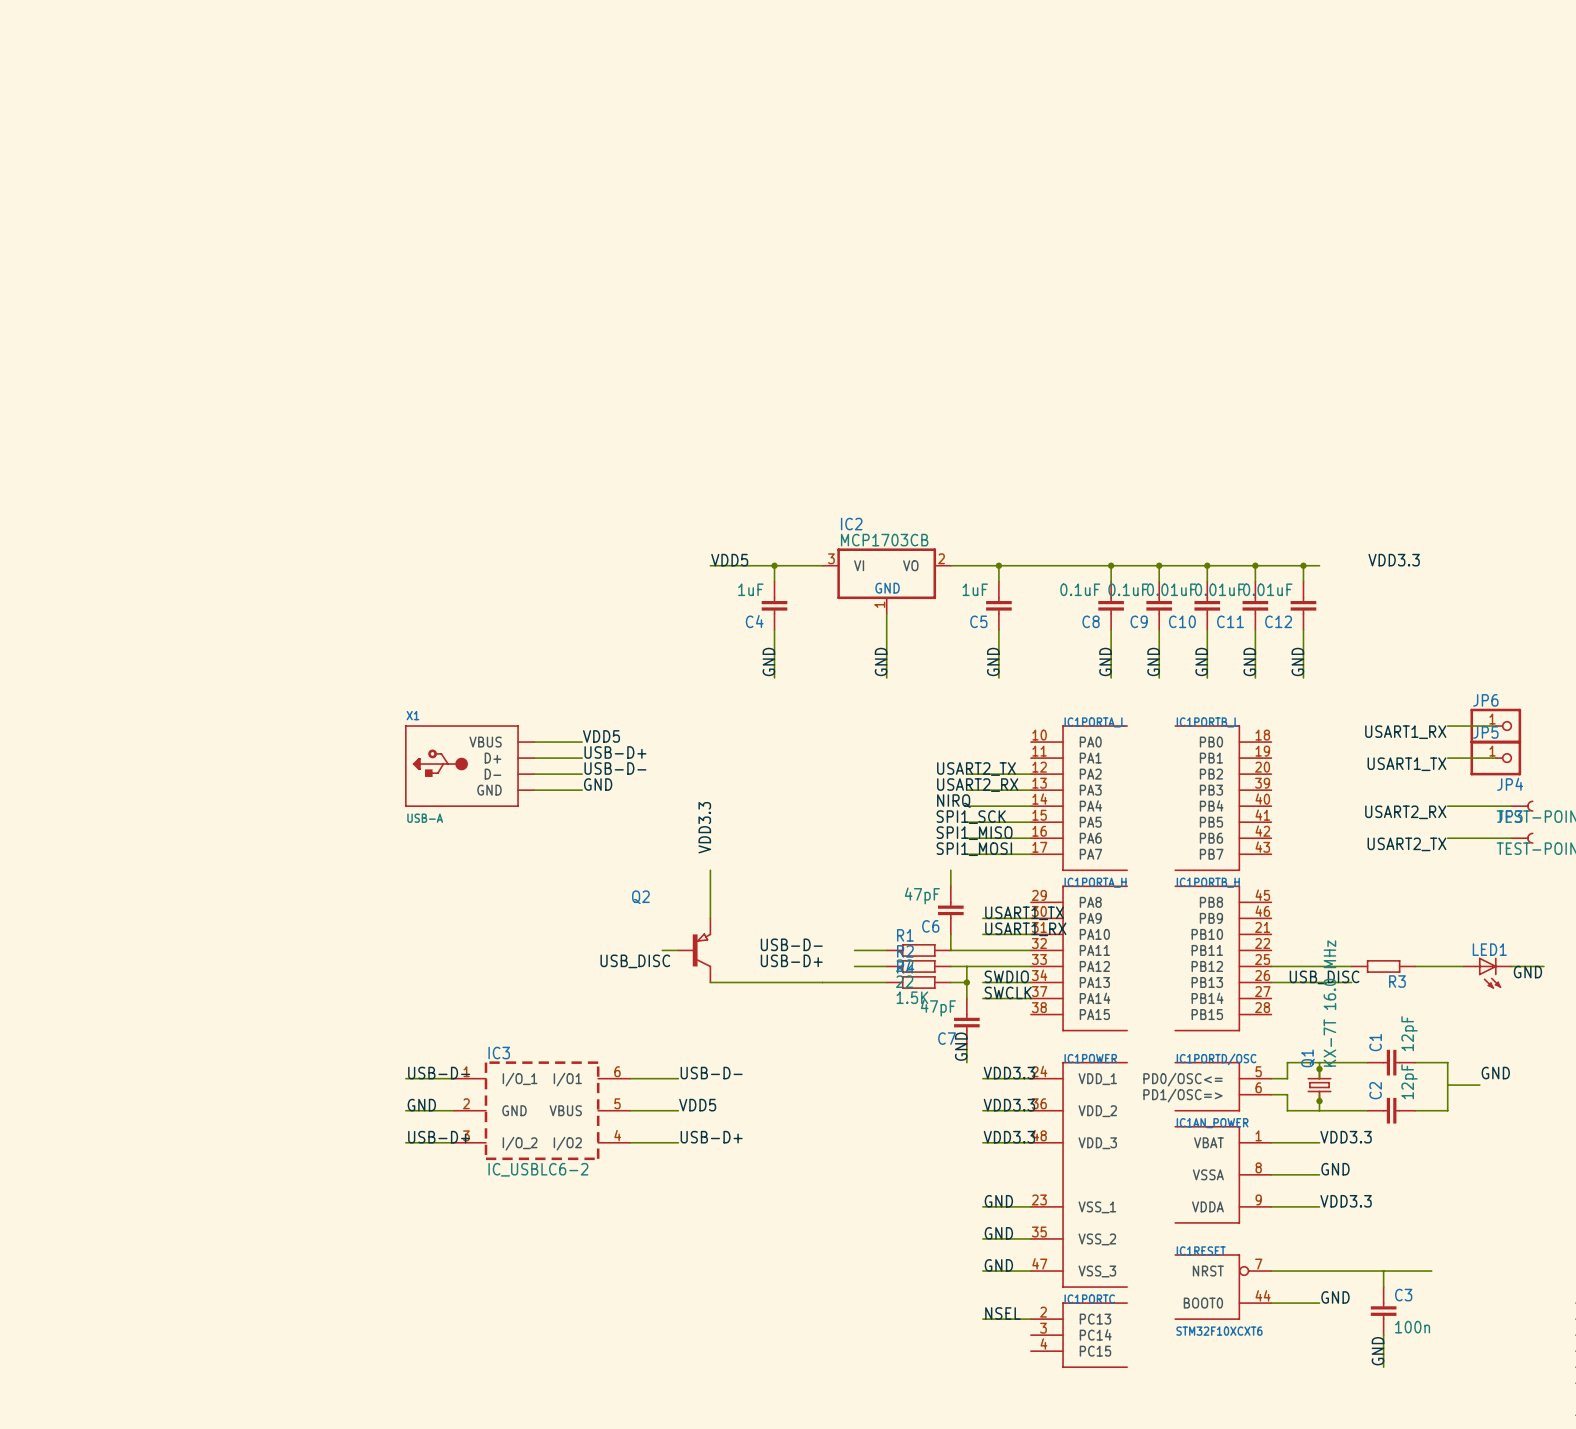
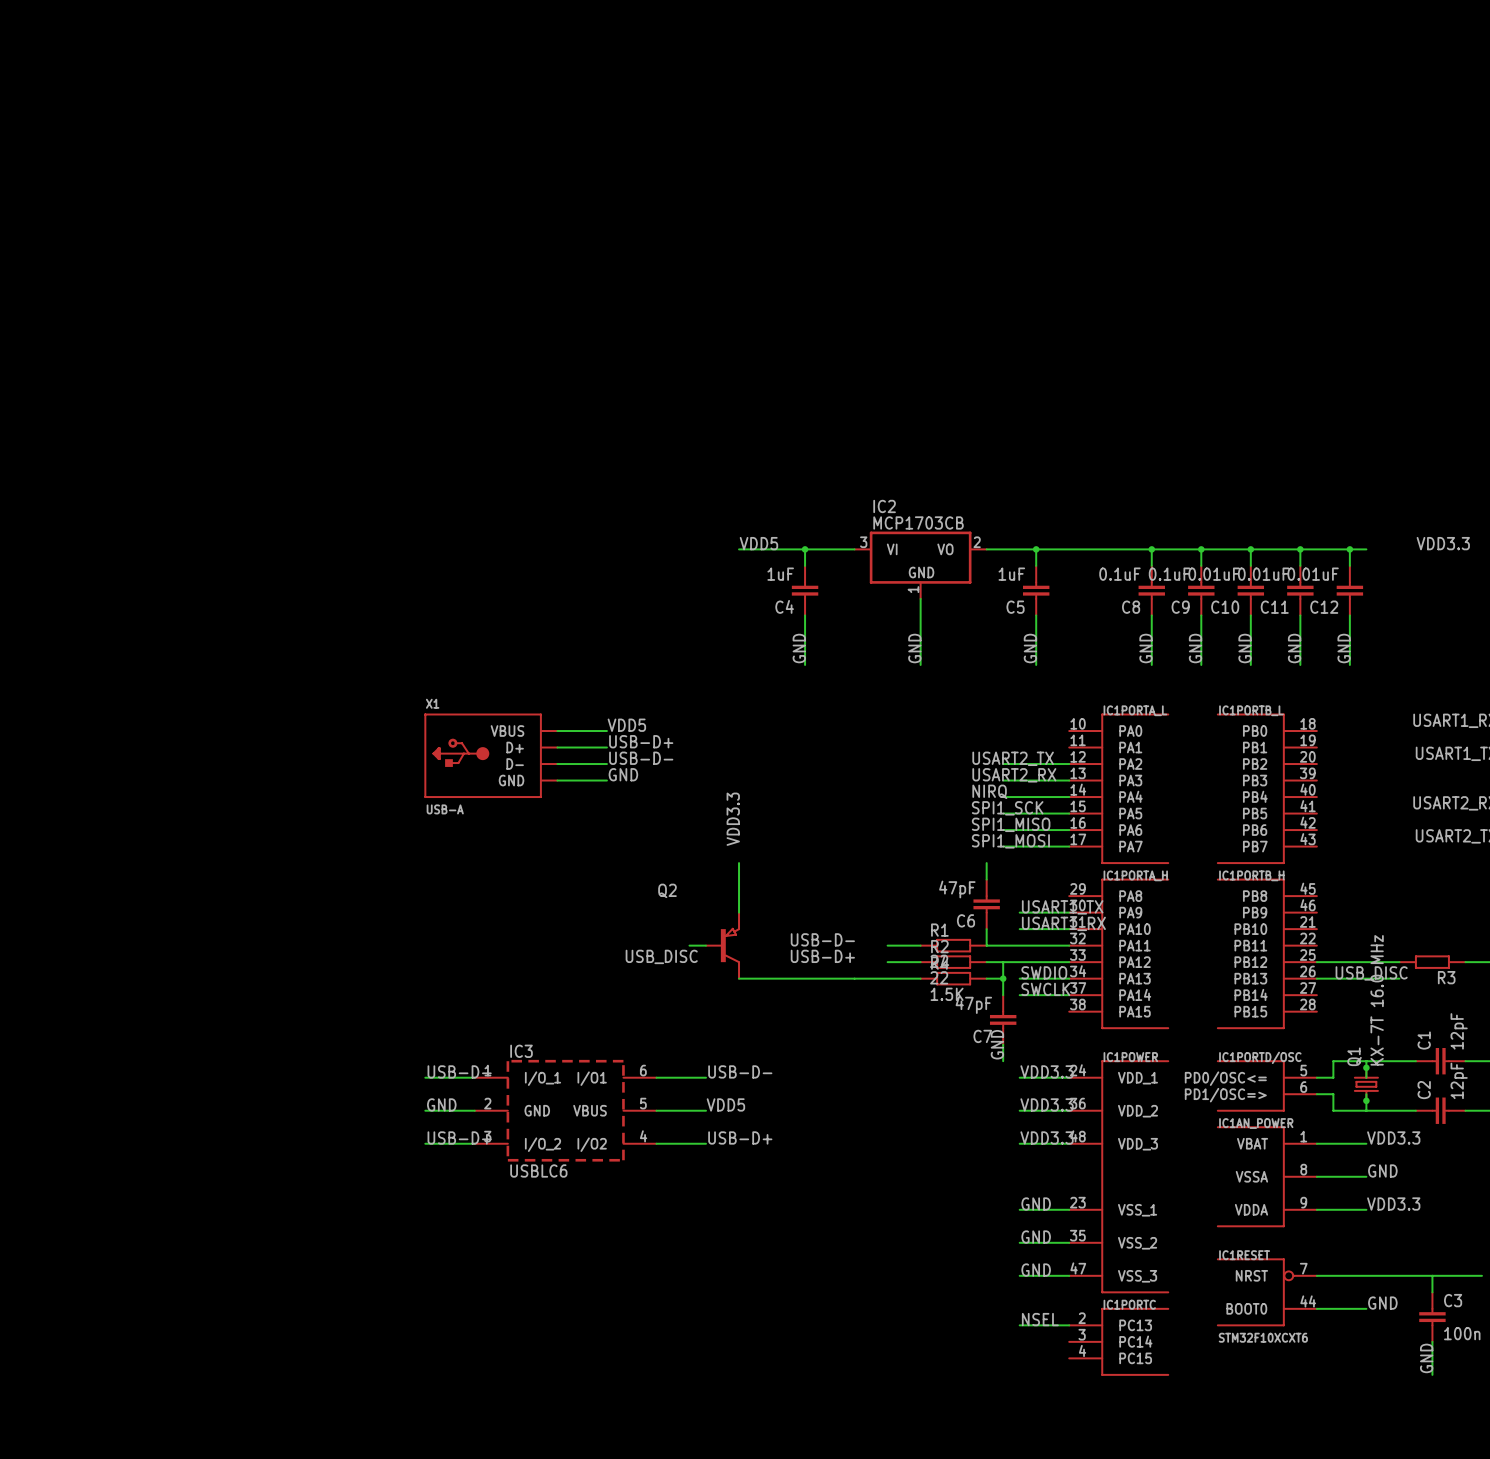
IC3 value: IC_USBLC6-2 (538, 1169) -> USBLC6 (538, 1170)

